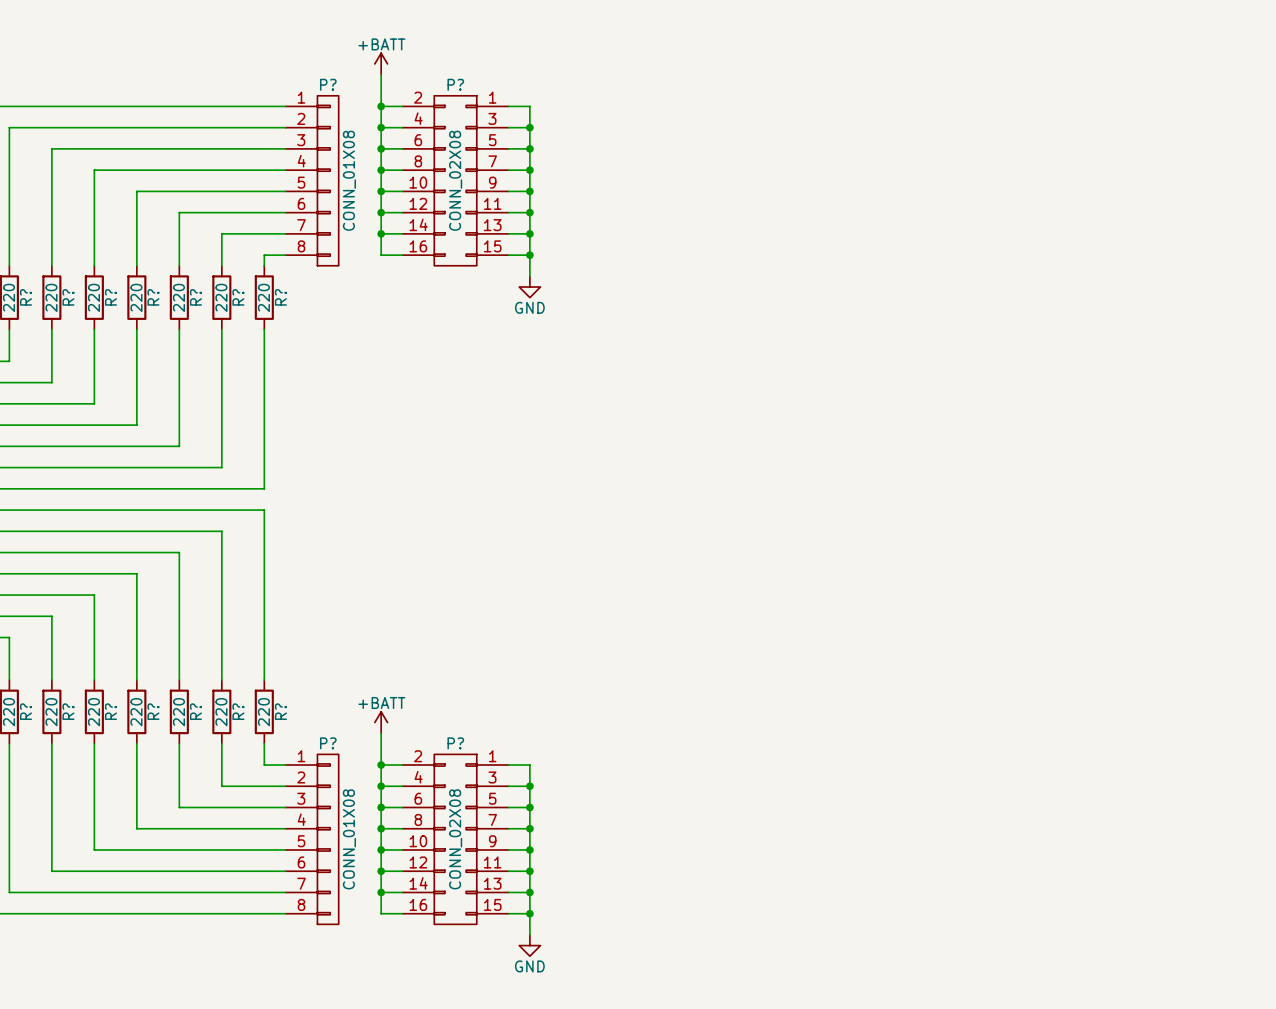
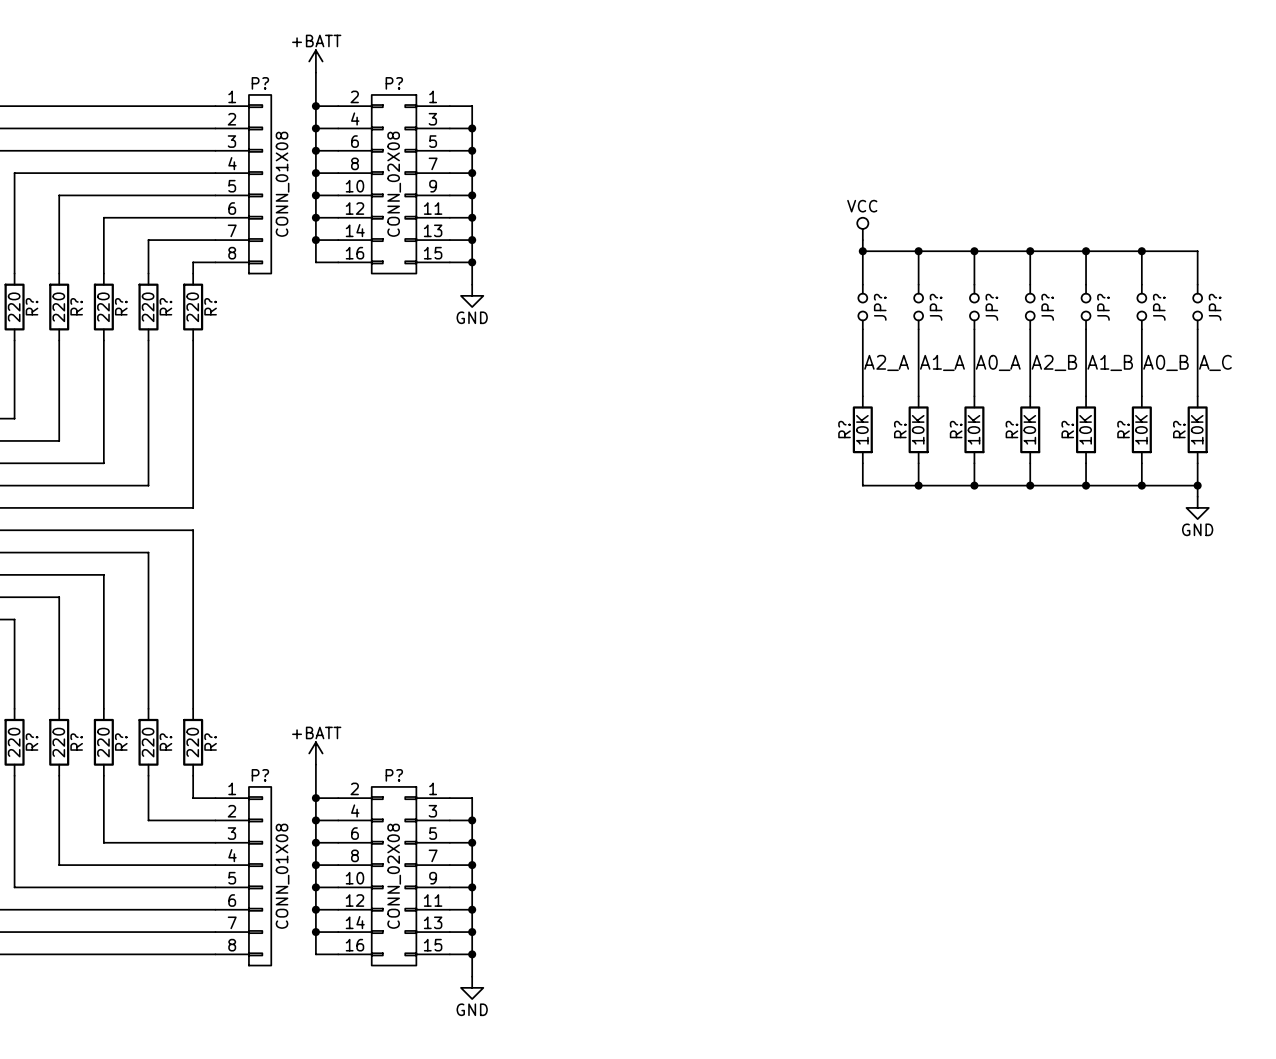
power symbol: none -> VCC (862, 228)
wire: none -> (862, 240) (862, 284)
wire: none -> (862, 251) (1197, 251) (1197, 284)
junction: none -> (862, 251)
wire: none -> (918, 251) (918, 284)
junction: none -> (918, 251)
wire: none -> (974, 251) (974, 284)
junction: none -> (974, 251)
wire: none -> (1030, 251) (1030, 284)
junction: none -> (1030, 251)
wire: none -> (1086, 251) (1086, 284)
junction: none -> (1086, 251)
wire: none -> (1141, 251) (1141, 284)
junction: none -> (1141, 251)
JP?: none -> (862, 307)
JP?: none -> (918, 307)
JP?: none -> (974, 307)
JP?: none -> (1030, 307)
JP?: none -> (1086, 307)
JP?: none -> (1141, 307)
JP?: none -> (1197, 307)
wire: none -> (862, 329) (862, 396)
wire: none -> (918, 329) (918, 396)
wire: none -> (974, 329) (974, 396)
wire: none -> (1030, 329) (1030, 396)
wire: none -> (1086, 329) (1086, 396)
wire: none -> (1141, 329) (1141, 396)
wire: none -> (1197, 329) (1197, 396)
label: none -> A2_A (886, 362)
label: none -> A1_A (942, 362)
label: none -> A0_A (998, 362)
label: none -> A2_B (1054, 362)
label: none -> A1_B (1110, 362)
label: none -> A0_B (1166, 362)
label: none -> A_C (1215, 362)
R?: none -> 10K (862, 429)
R?: none -> 10K (918, 429)
R?: none -> 10K (974, 429)
R?: none -> 10K (1030, 429)
R?: none -> 10K (1086, 429)
R?: none -> 10K (1141, 429)
R?: none -> 10K (1197, 429)
wire: none -> (862, 463) (862, 485) (1197, 485)
wire: none -> (918, 463) (918, 485)
wire: none -> (974, 463) (974, 485)
wire: none -> (1030, 463) (1030, 485)
wire: none -> (1086, 463) (1086, 485)
wire: none -> (1141, 463) (1141, 485)
wire: none -> (1197, 463) (1197, 496)
junction: none -> (918, 485)
junction: none -> (974, 485)
junction: none -> (1030, 485)
junction: none -> (1086, 485)
junction: none -> (1141, 485)
junction: none -> (1197, 485)
power symbol: none -> GND (1197, 507)

